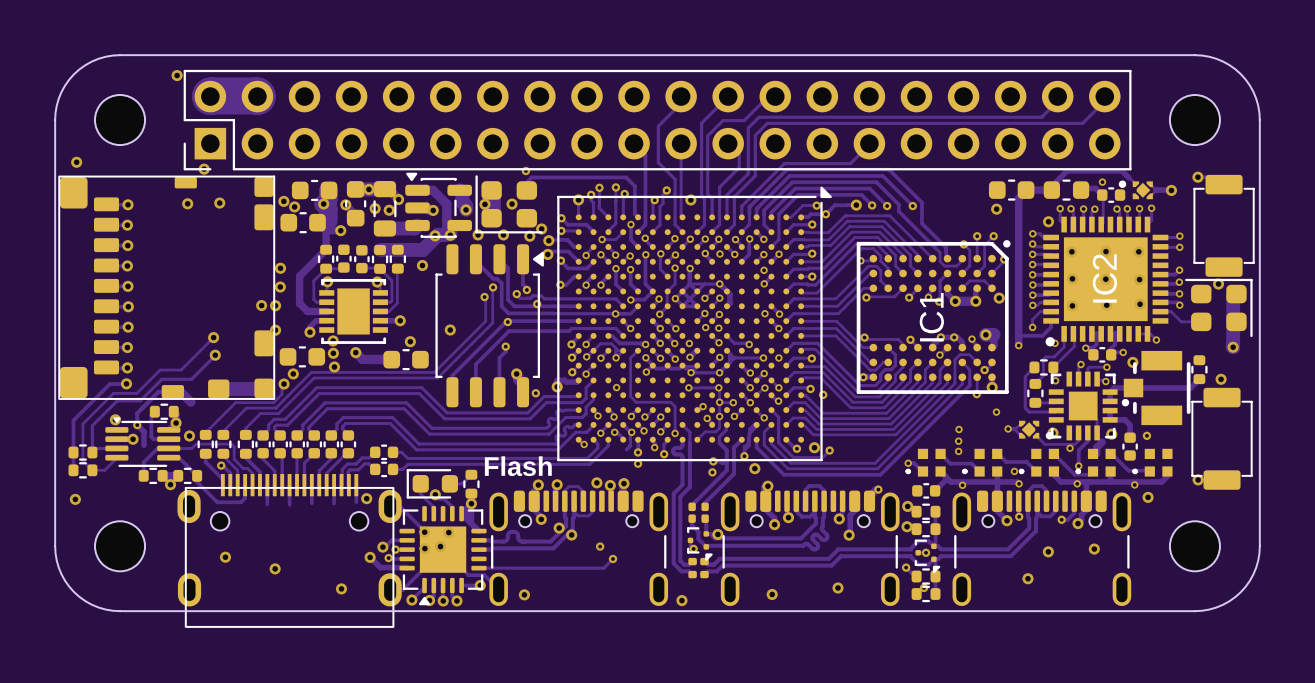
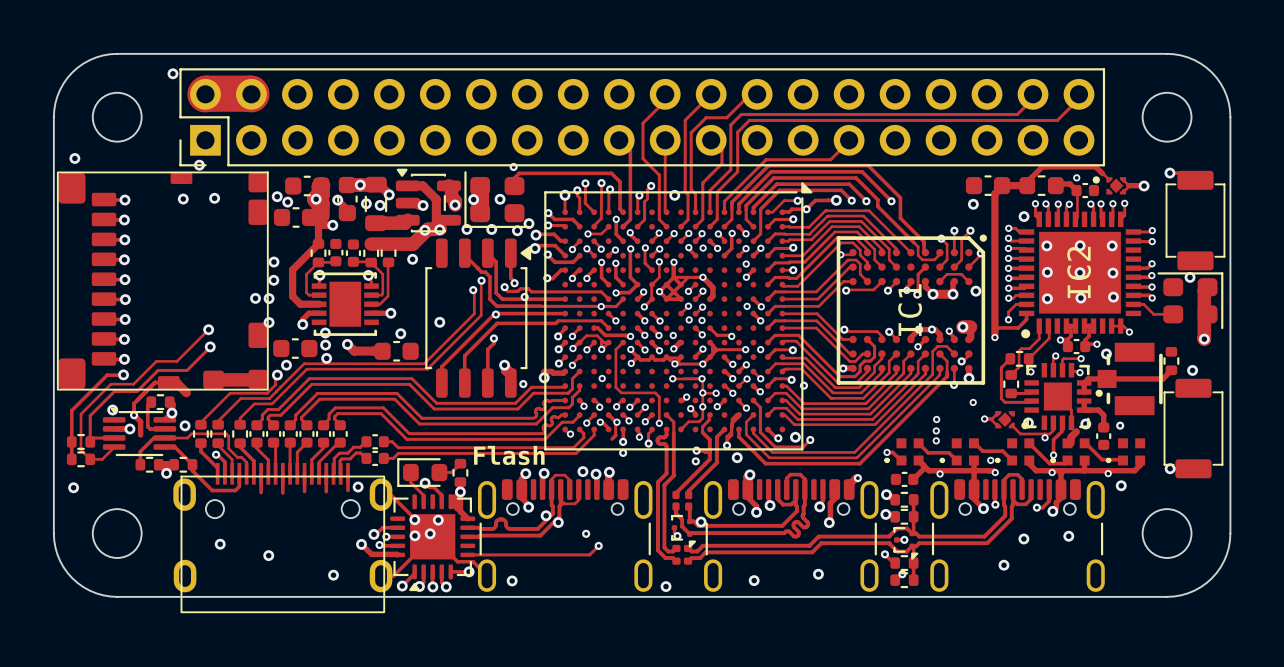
via: (1055, 343) -> none

